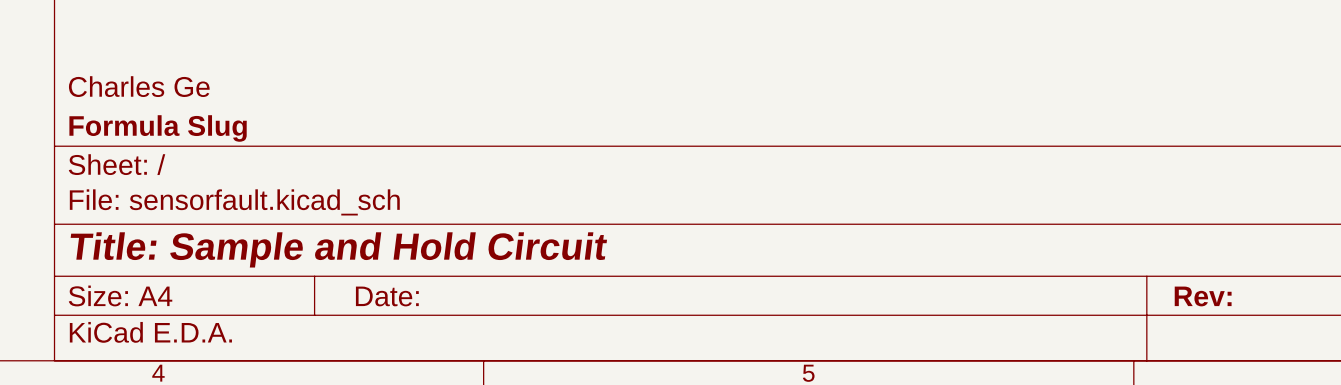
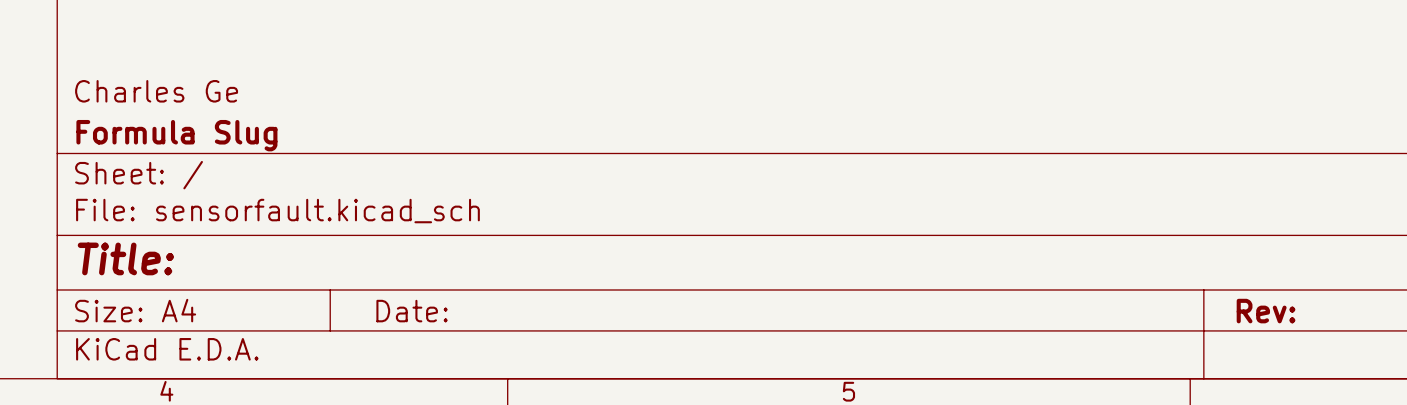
title block: Title: Sample and Hold Circuit (338, 249) -> Title: (125, 258)

